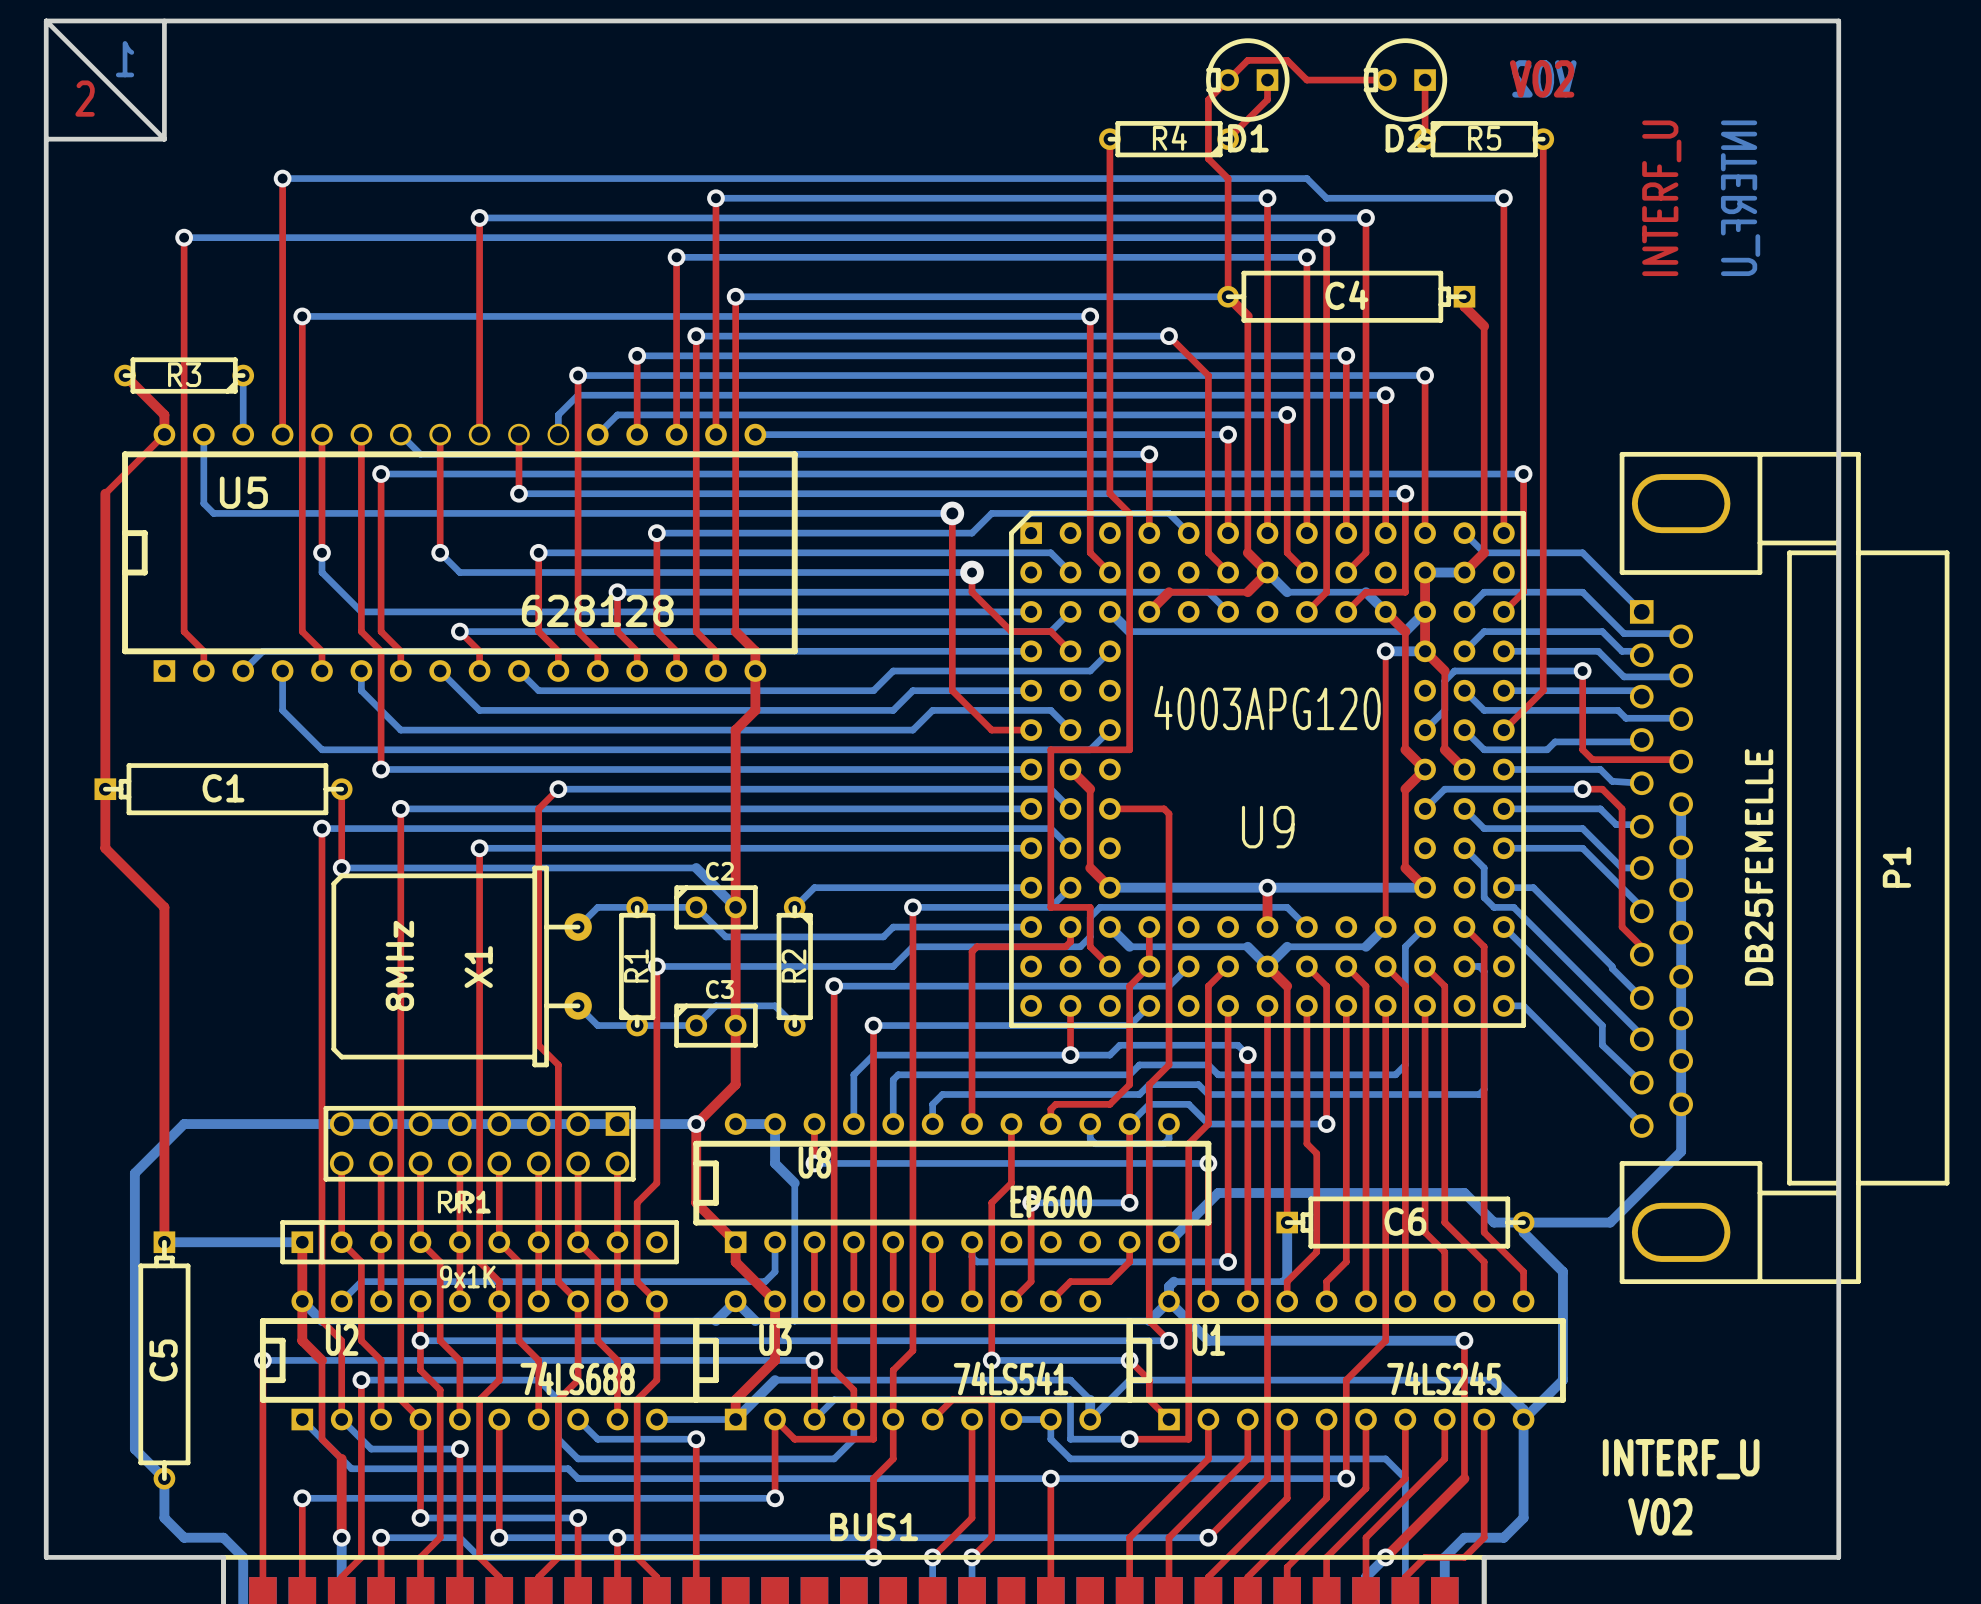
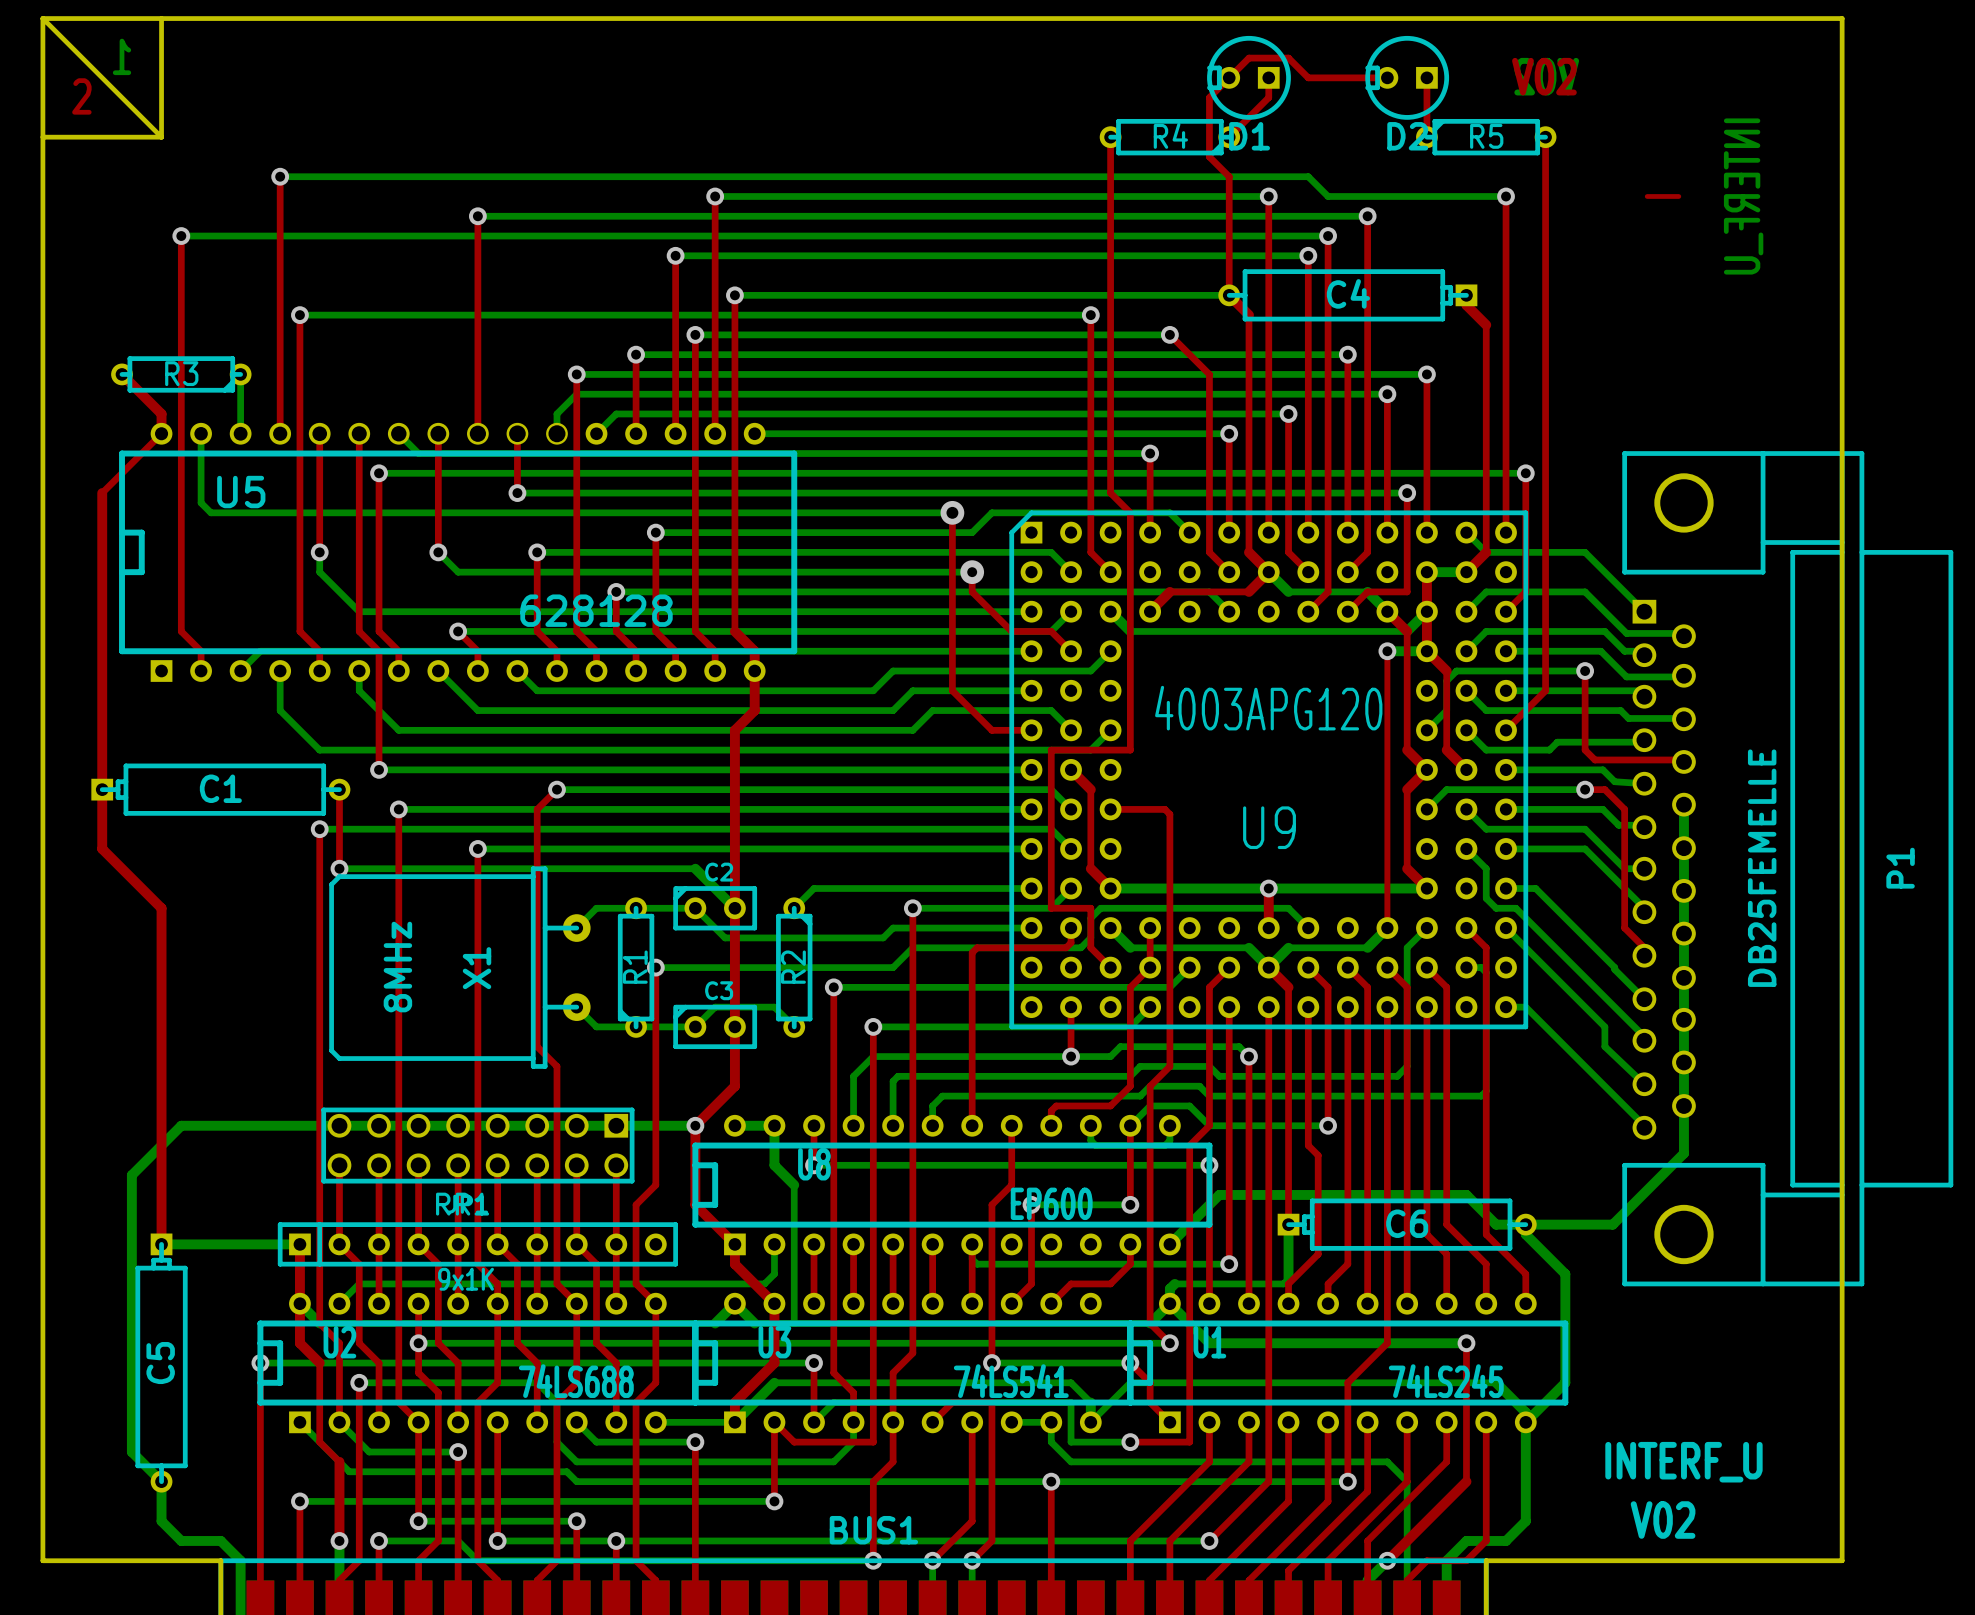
text: INTERF_U (1661, 198) -> I (1663, 196)
P1 footprint: [1619, 451, 1950, 1285] -> [1622, 451, 1954, 1287]

